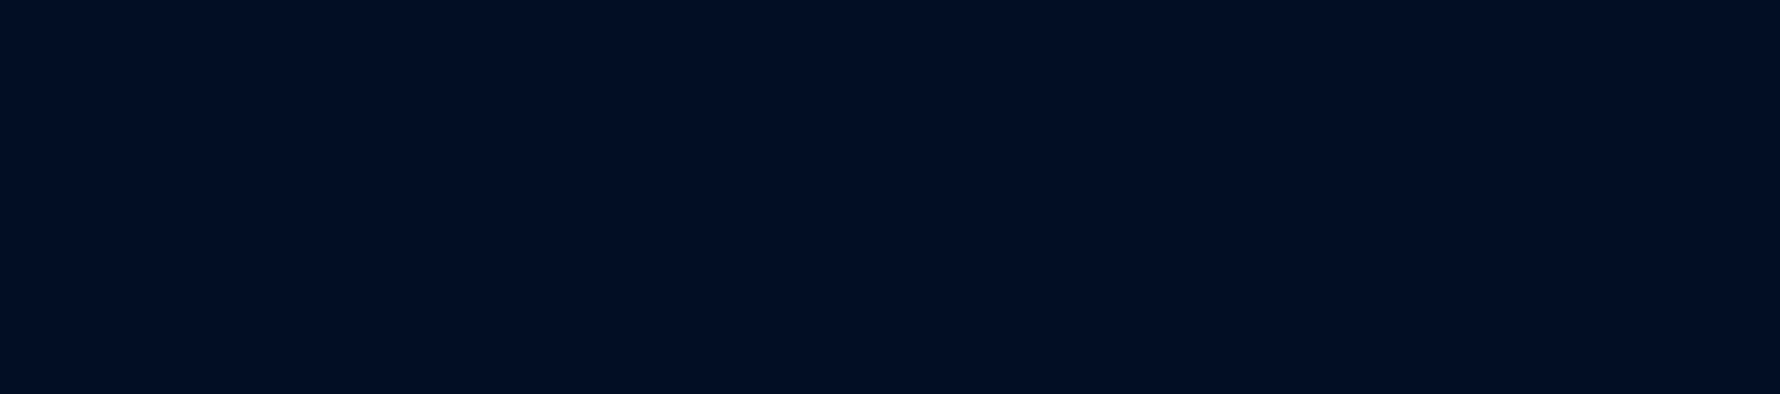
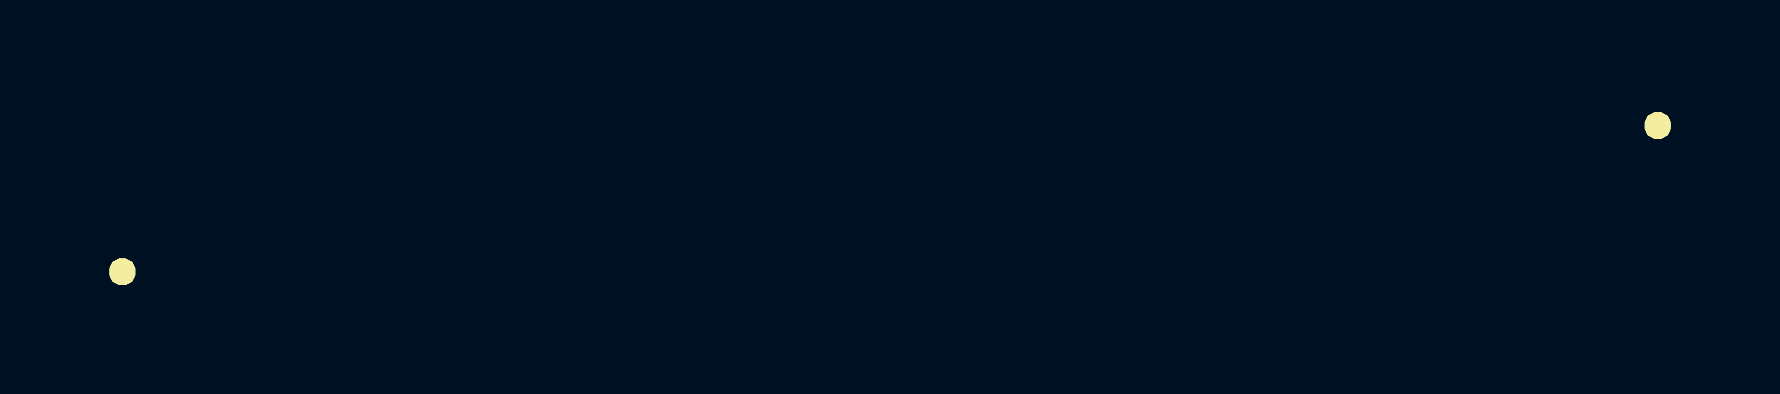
drawing: none -> [1644, 112, 1671, 139]
drawing: none -> [109, 258, 136, 285]

